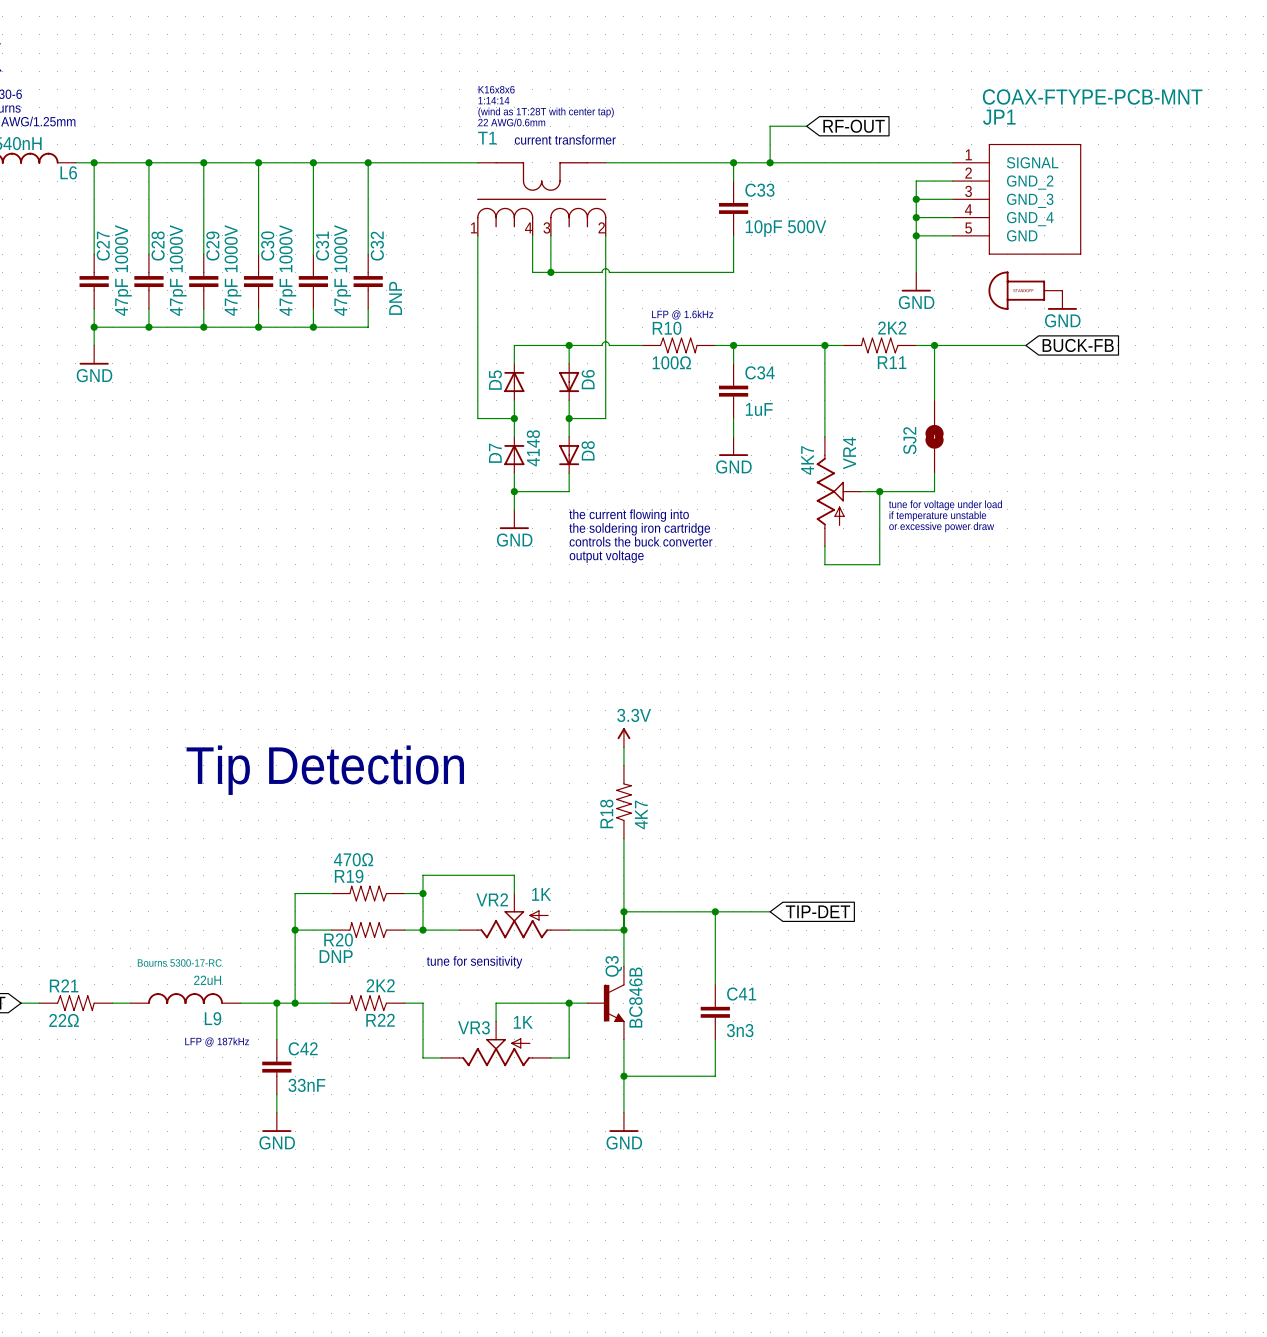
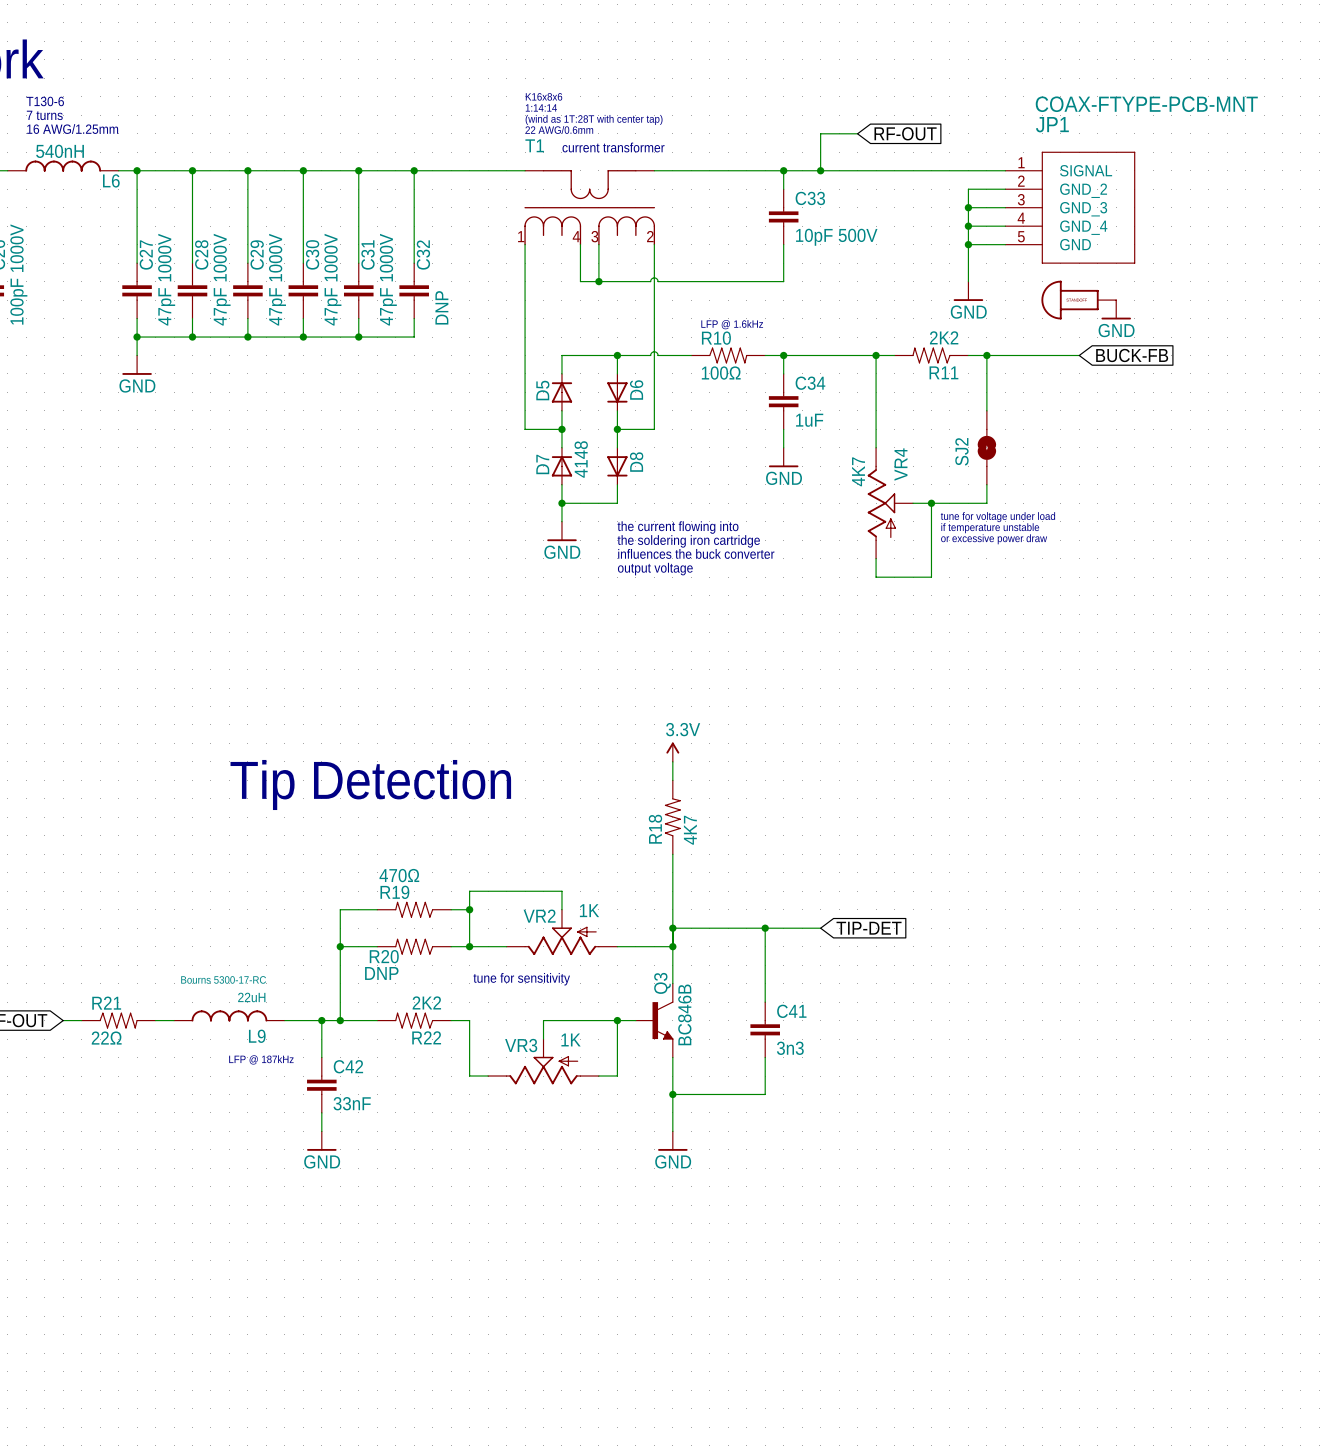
text: controls the buck converter (641, 541) -> influences the buck converter (696, 553)

